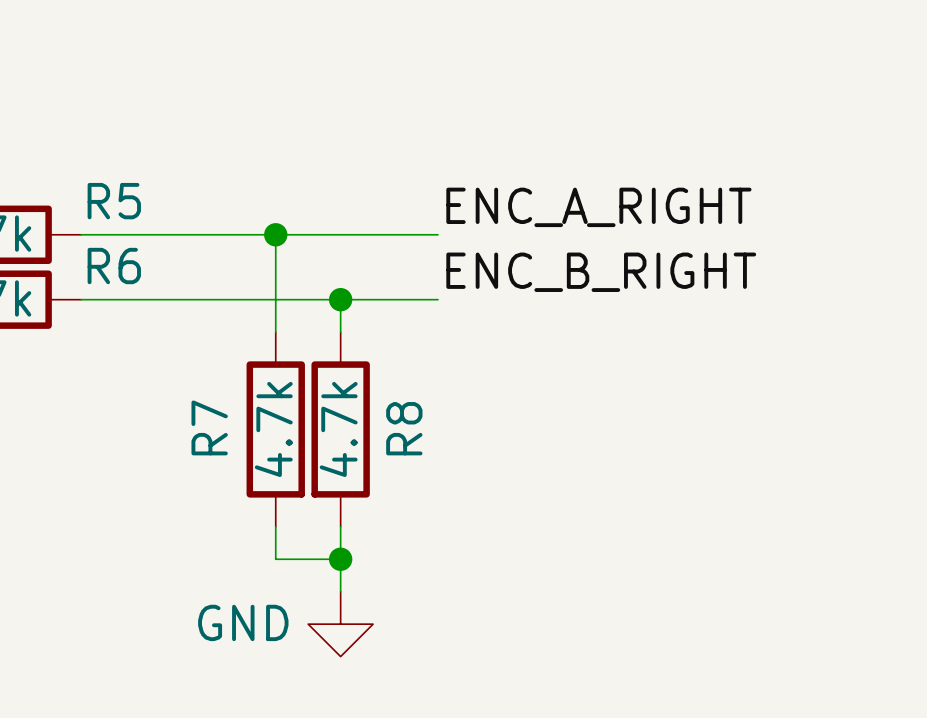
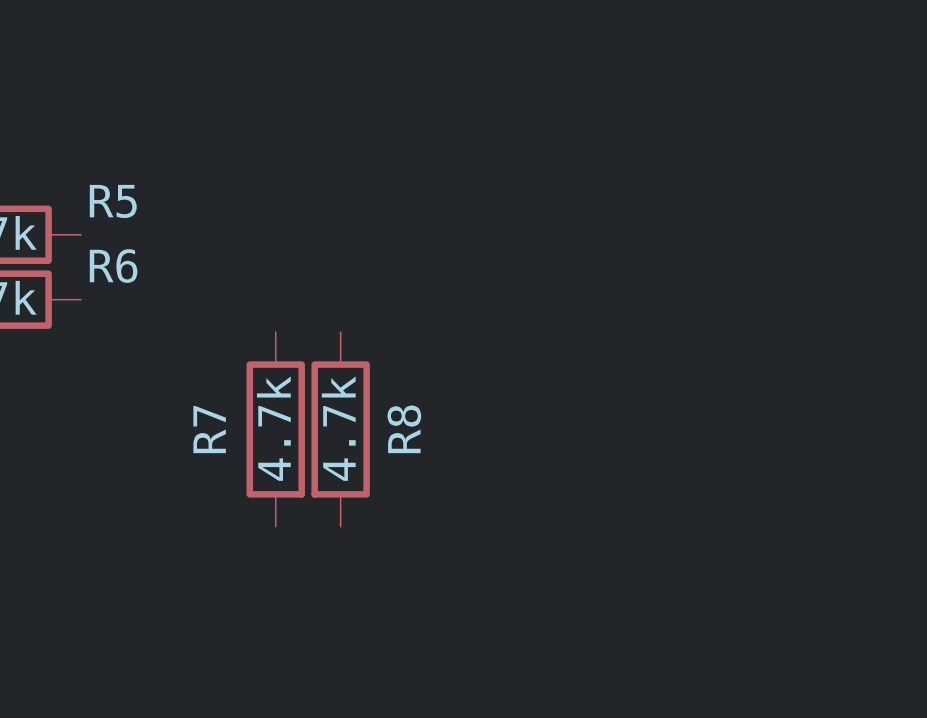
label: ENC_A_RIGHT (598, 207) -> none
wire: (81, 234) (437, 234) -> none
wire: (275, 234) (275, 332) -> none
junction: (275, 234) -> none
label: ENC_B_RIGHT (601, 272) -> none
wire: (81, 299) (437, 299) -> none
wire: (340, 299) (340, 332) -> none
junction: (340, 299) -> none
wire: (275, 526) (275, 559) (340, 559) -> none
wire: (340, 526) (340, 591) -> none
junction: (340, 559) -> none
power symbol: GND (340, 624) -> none

